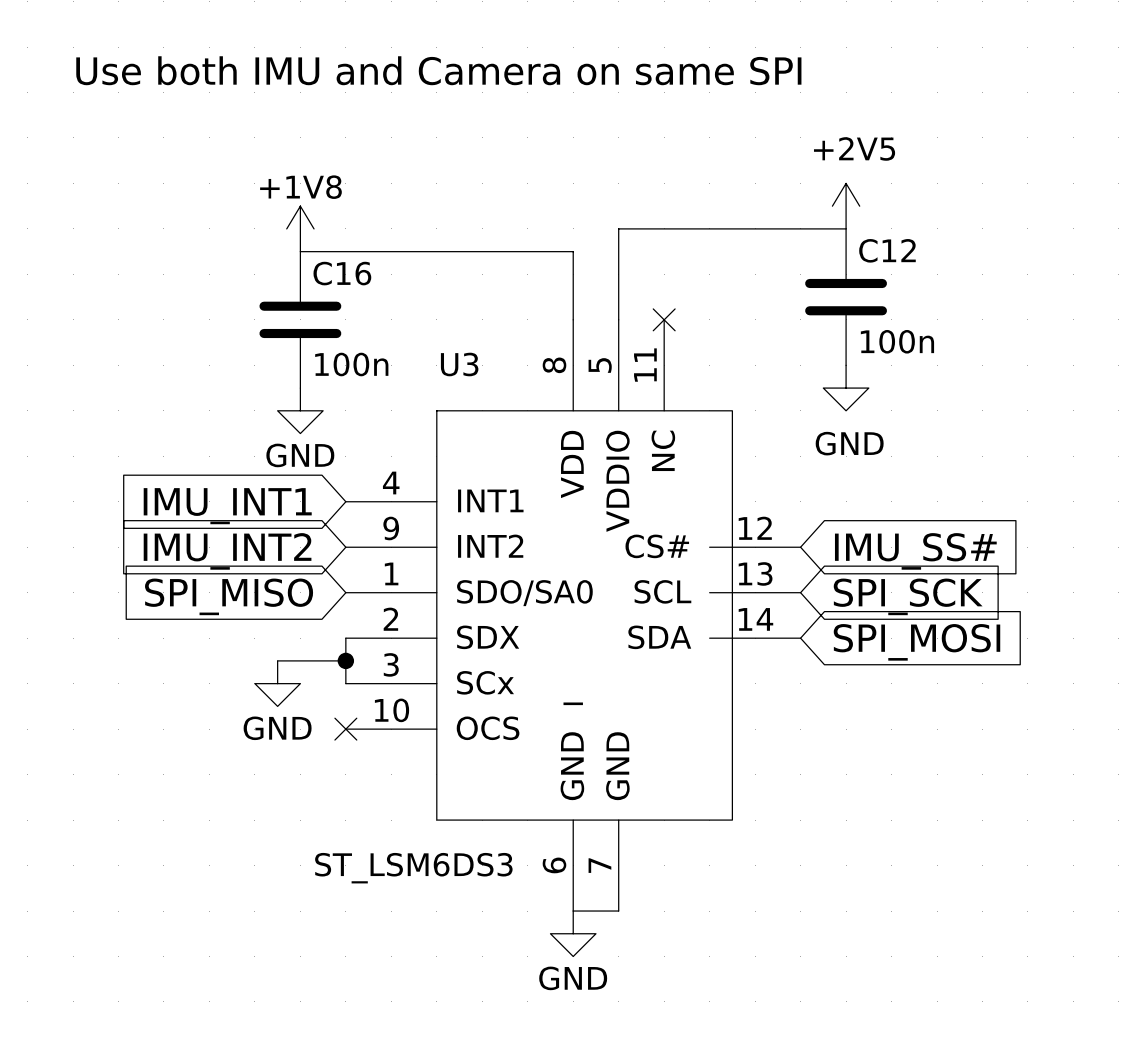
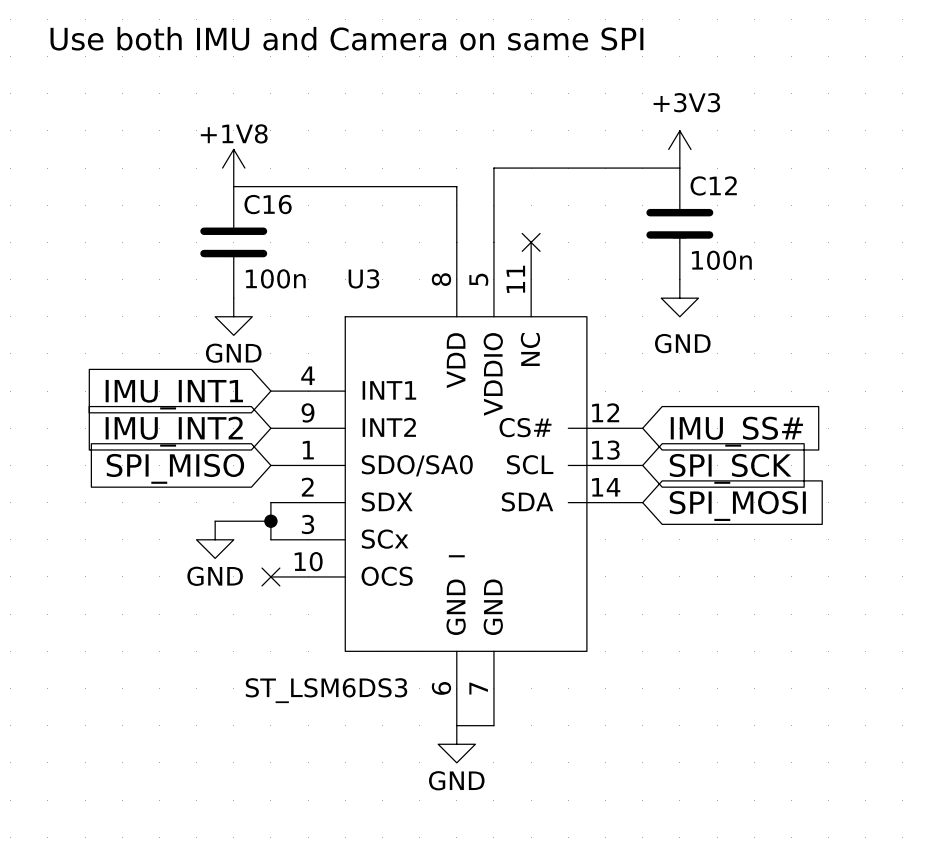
power symbol: +2V5 (846, 206) -> +3V3 (679, 149)

